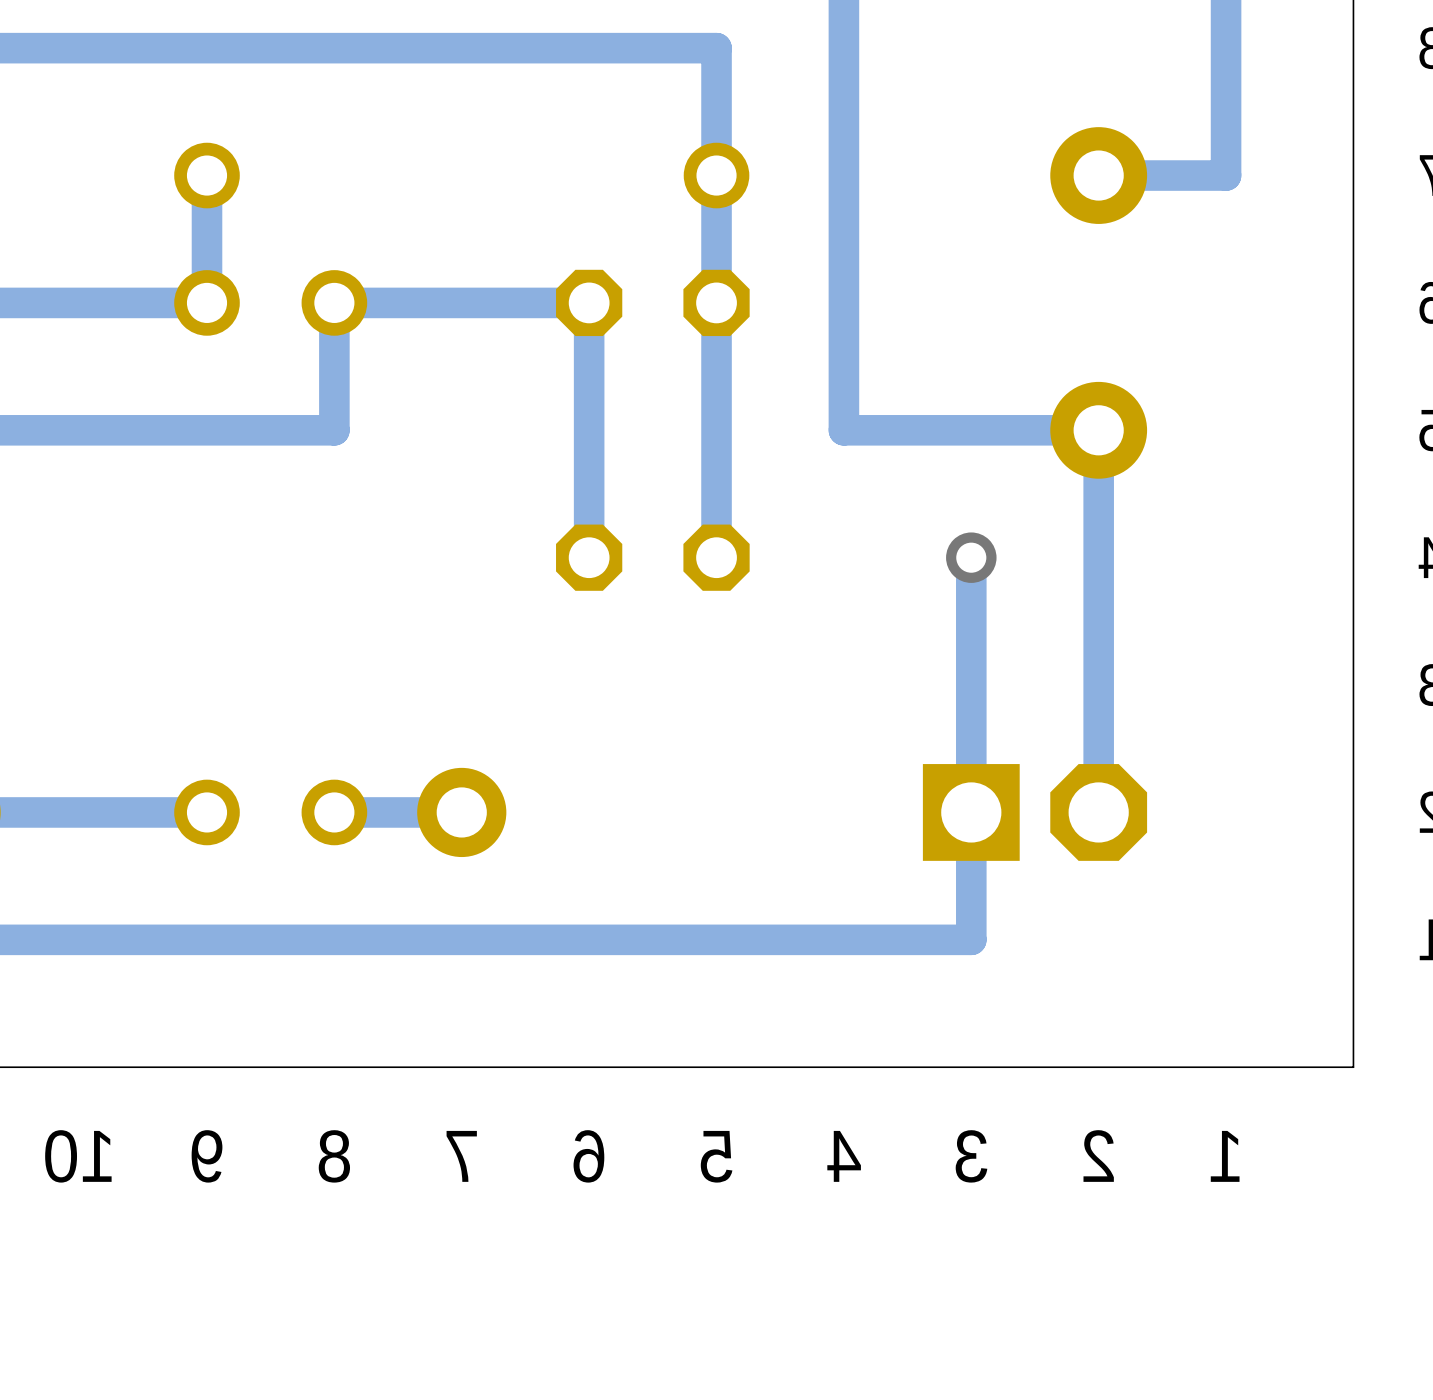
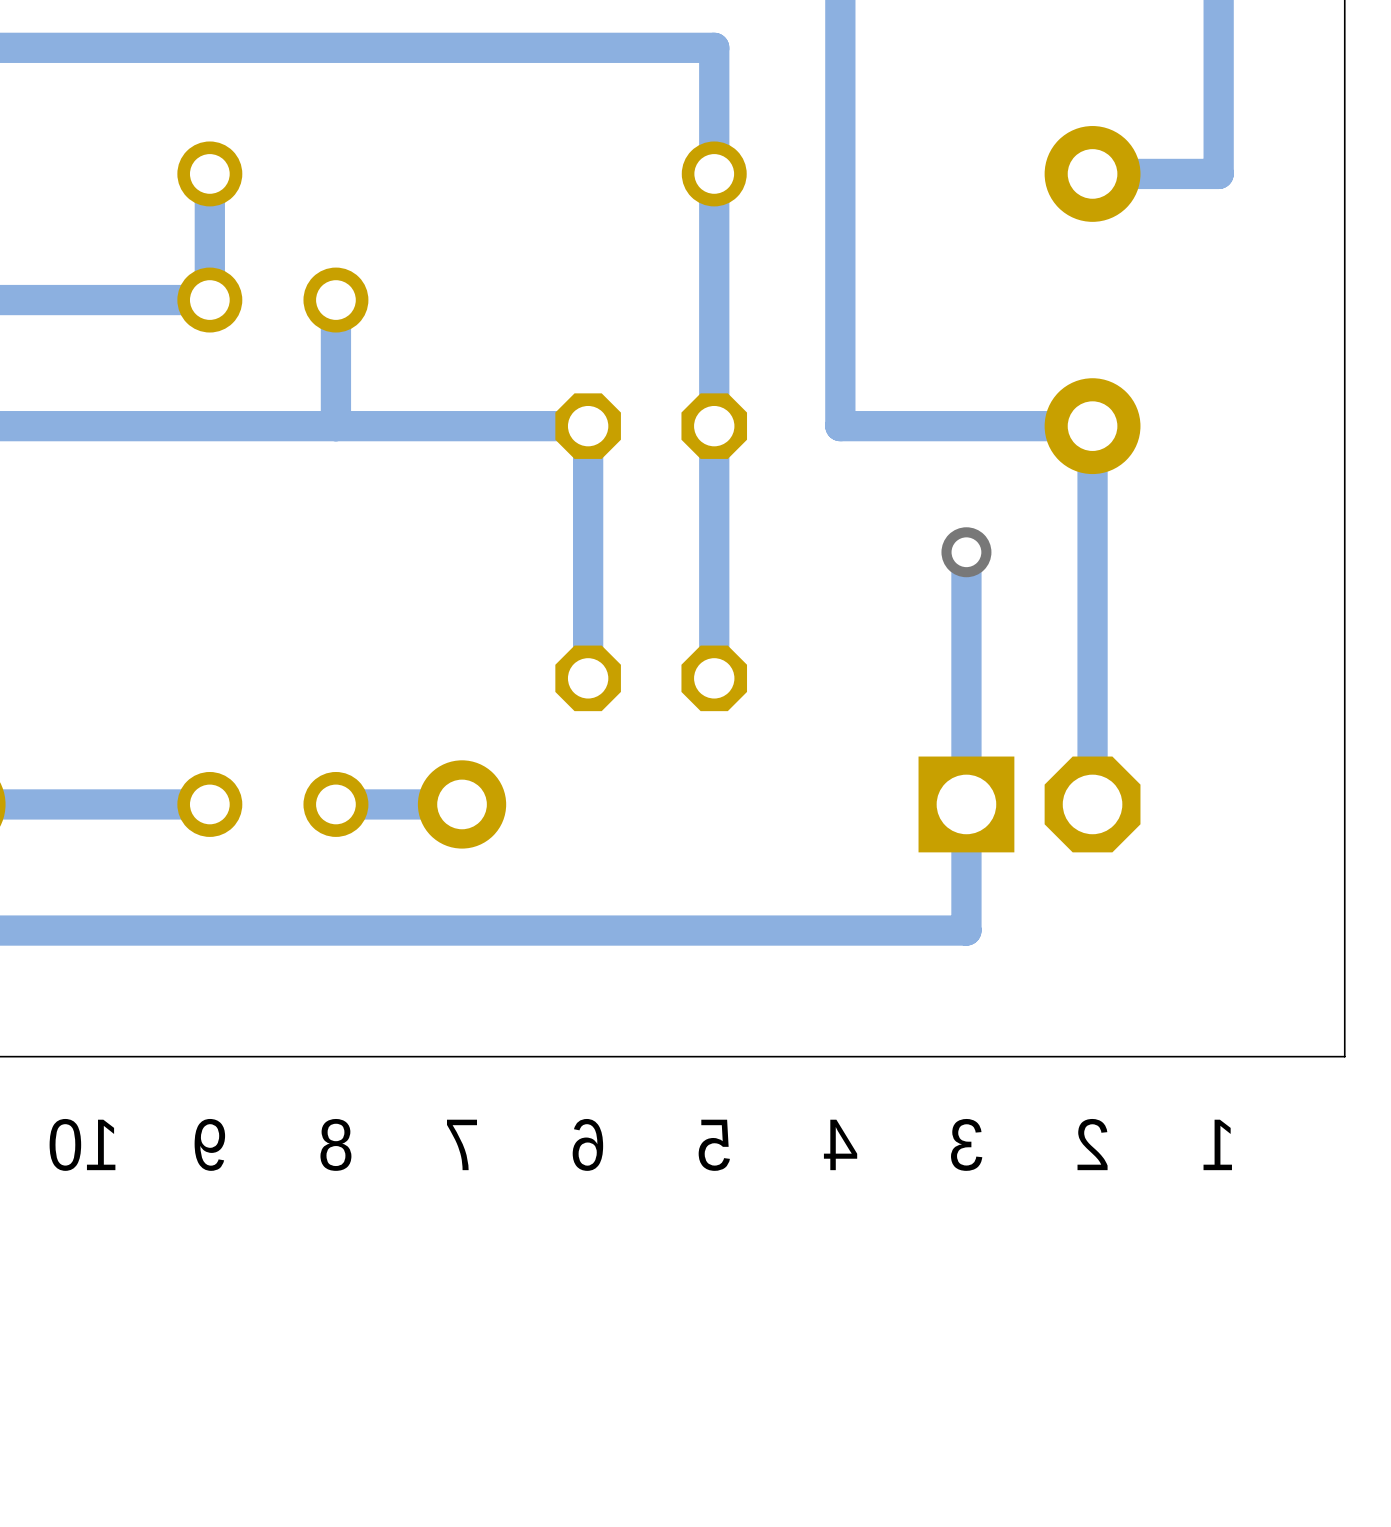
track: (334, 302) (589, 302) (589, 430) -> (335, 426) (588, 426)
part: (652, 302) -> none
part: none -> (651, 426)
track: none -> (588, 552) (588, 678)
part: (652, 557) -> none
track: none -> (714, 552) (714, 678)
part: none -> (651, 678)

